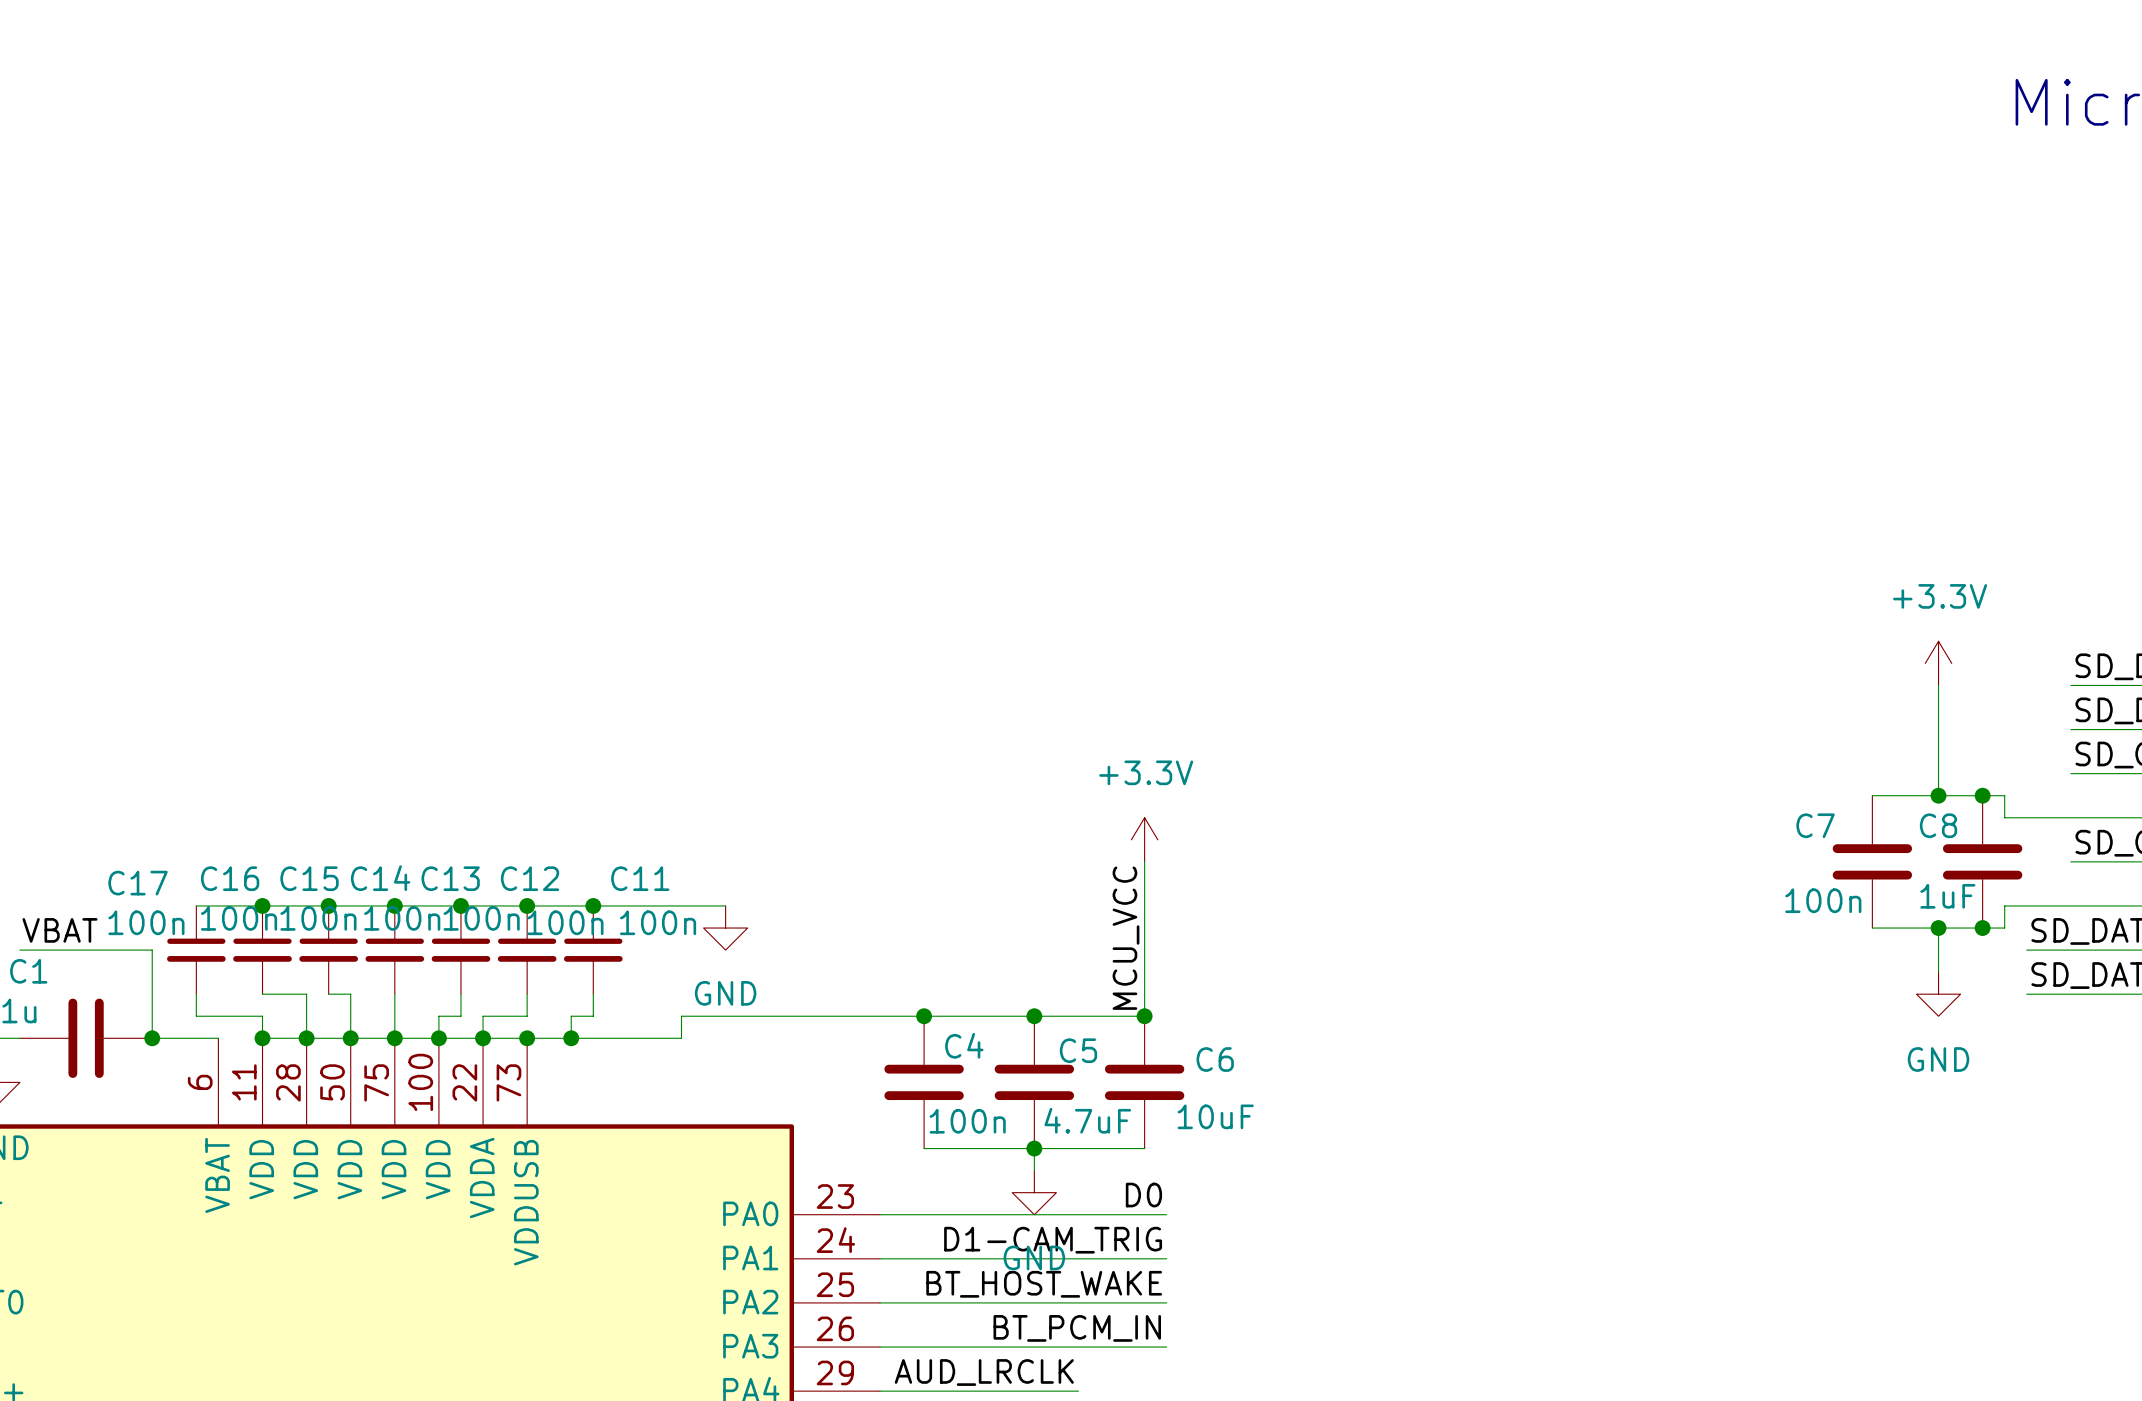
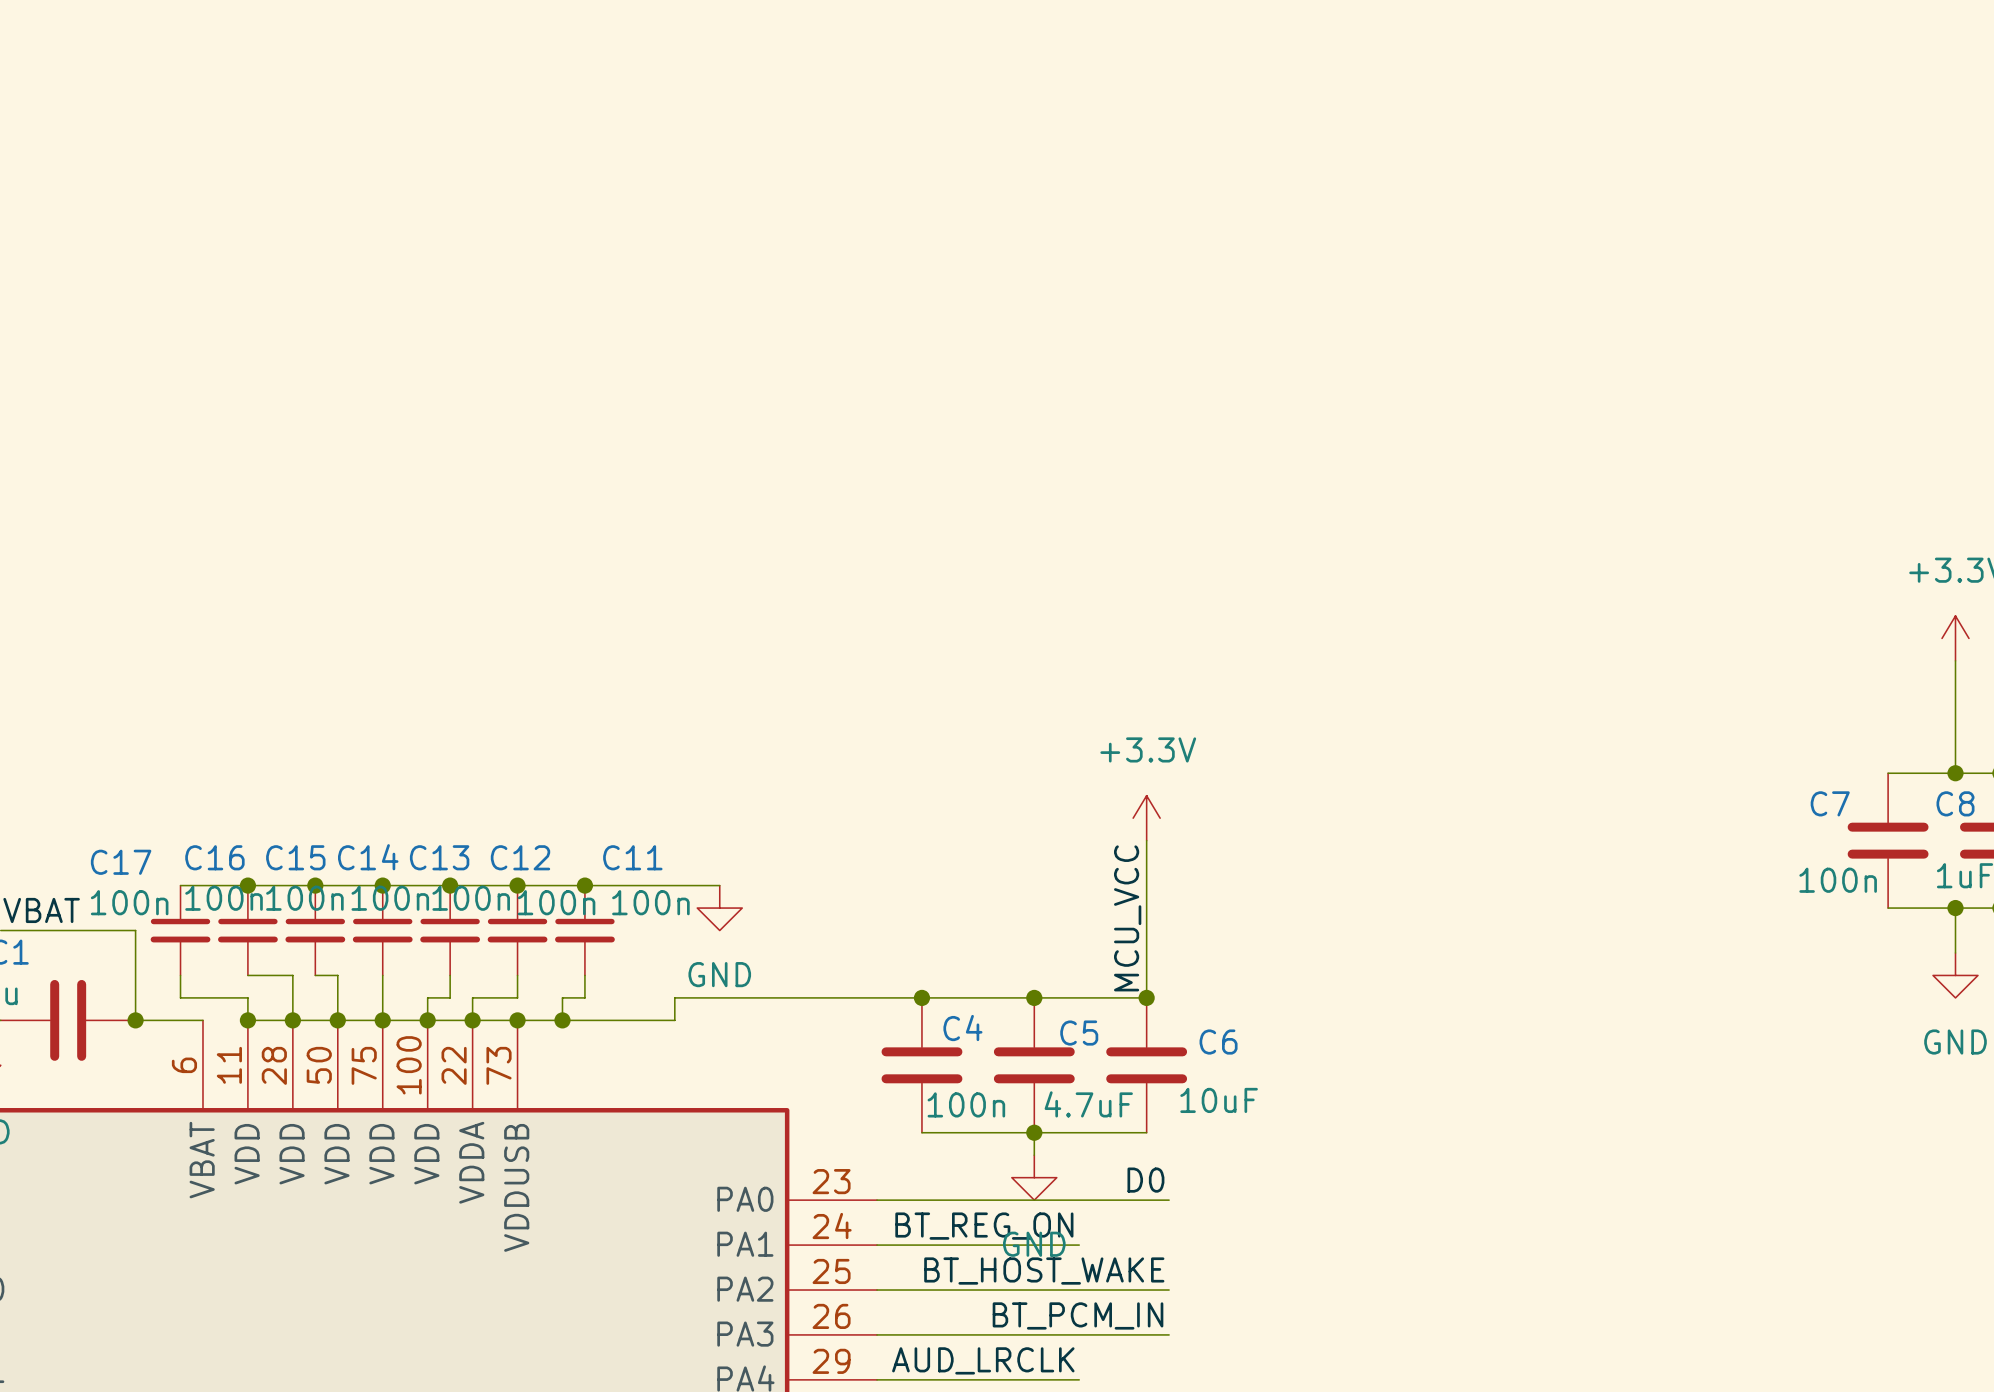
label: none -> BT_REG_ON (984, 1226)
label: D1-CAM_TRIG (1053, 1240) -> none
wire: (1078, 1258) (1166, 1258) -> none

